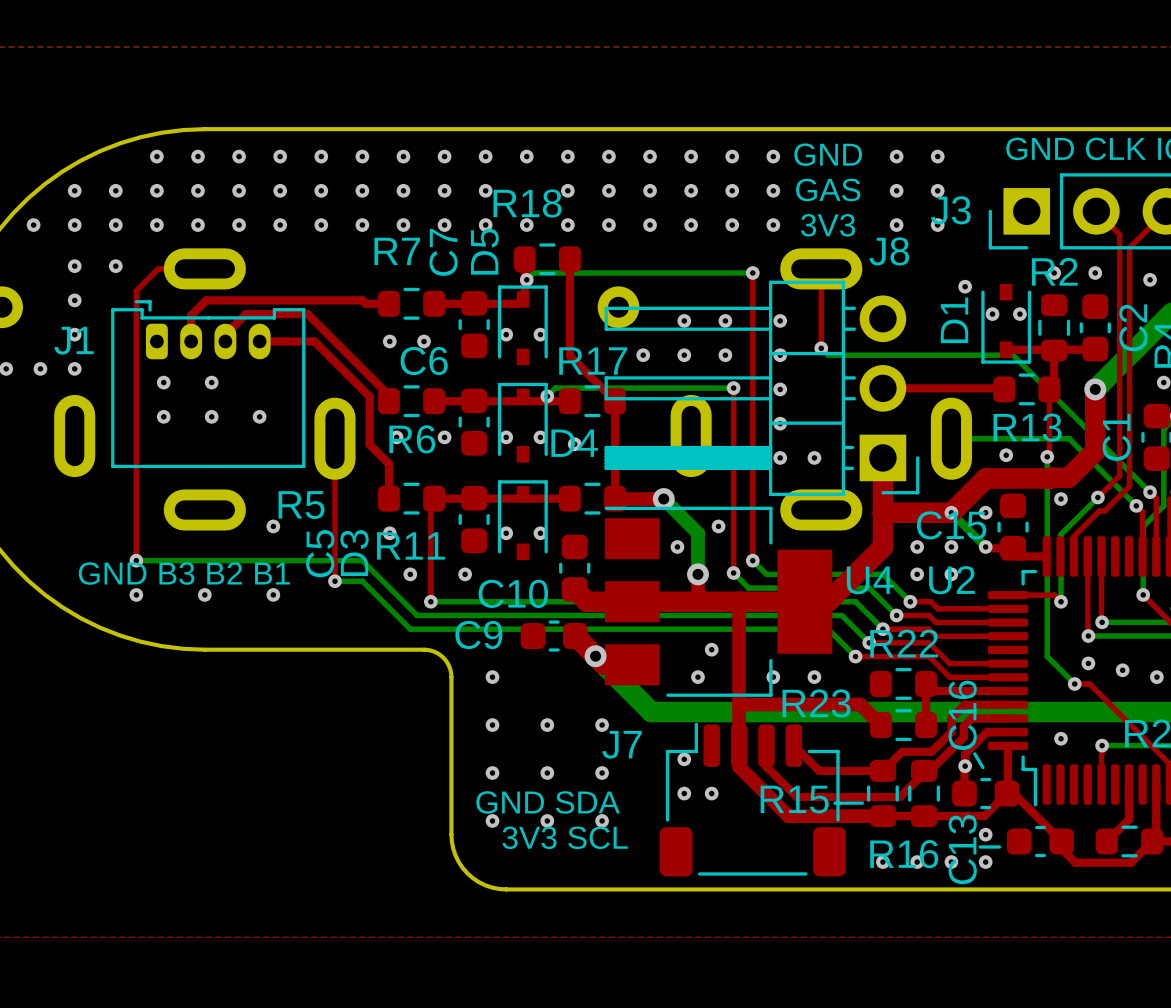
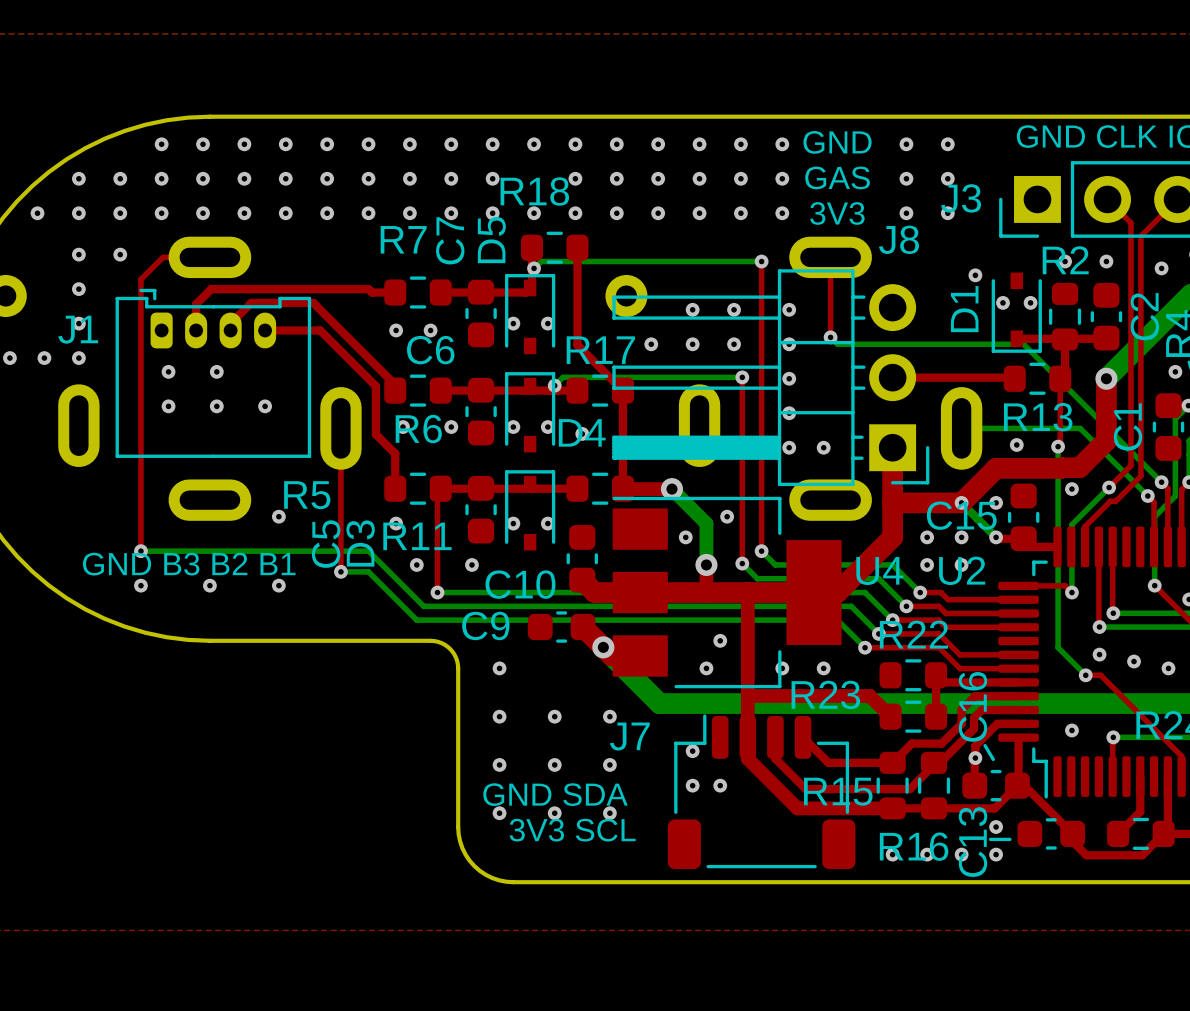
R15 name position: R15 (794, 799) -> R15 (838, 791)
line: (834, 803) (862, 803) -> none

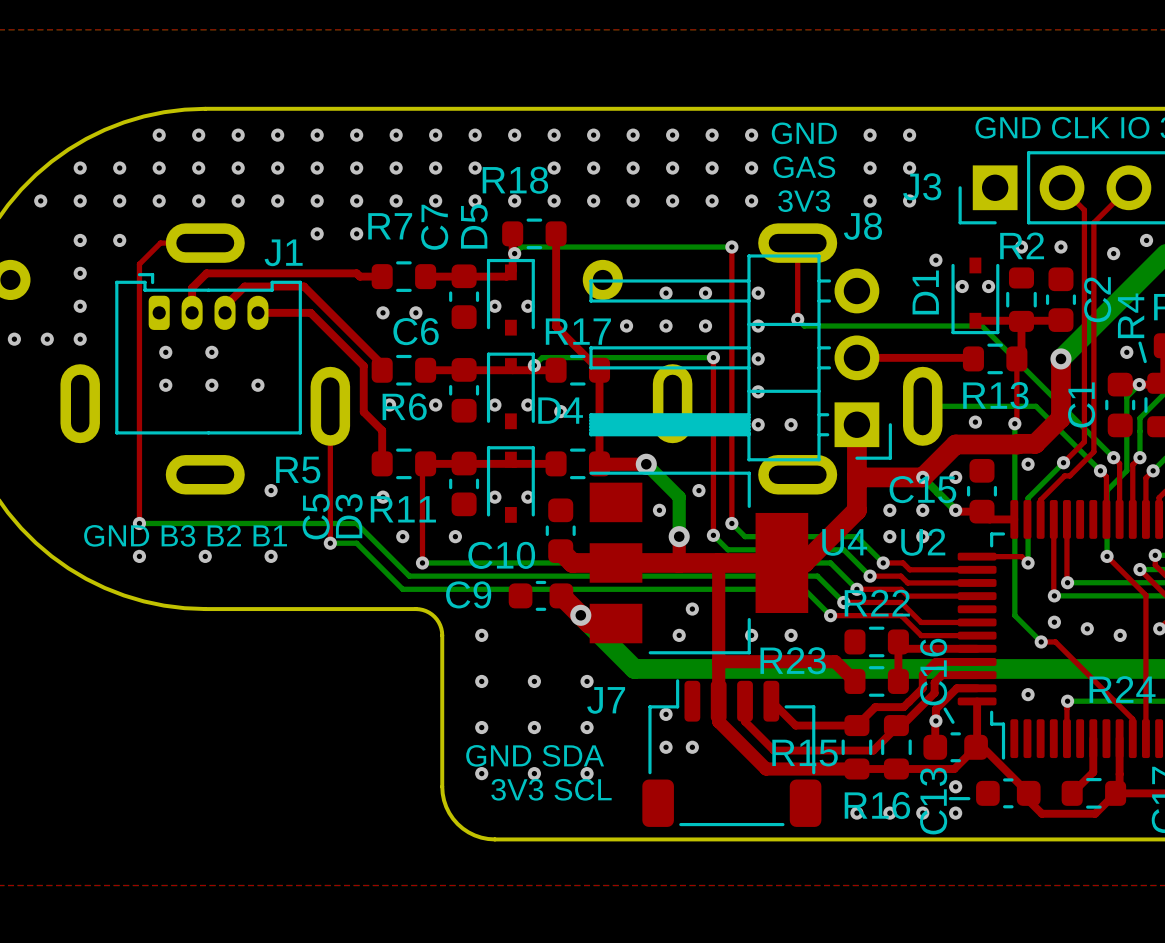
via: none -> (317, 233)
via: none -> (356, 233)
J1 name position: J1 (78, 329) -> J1 (283, 252)

